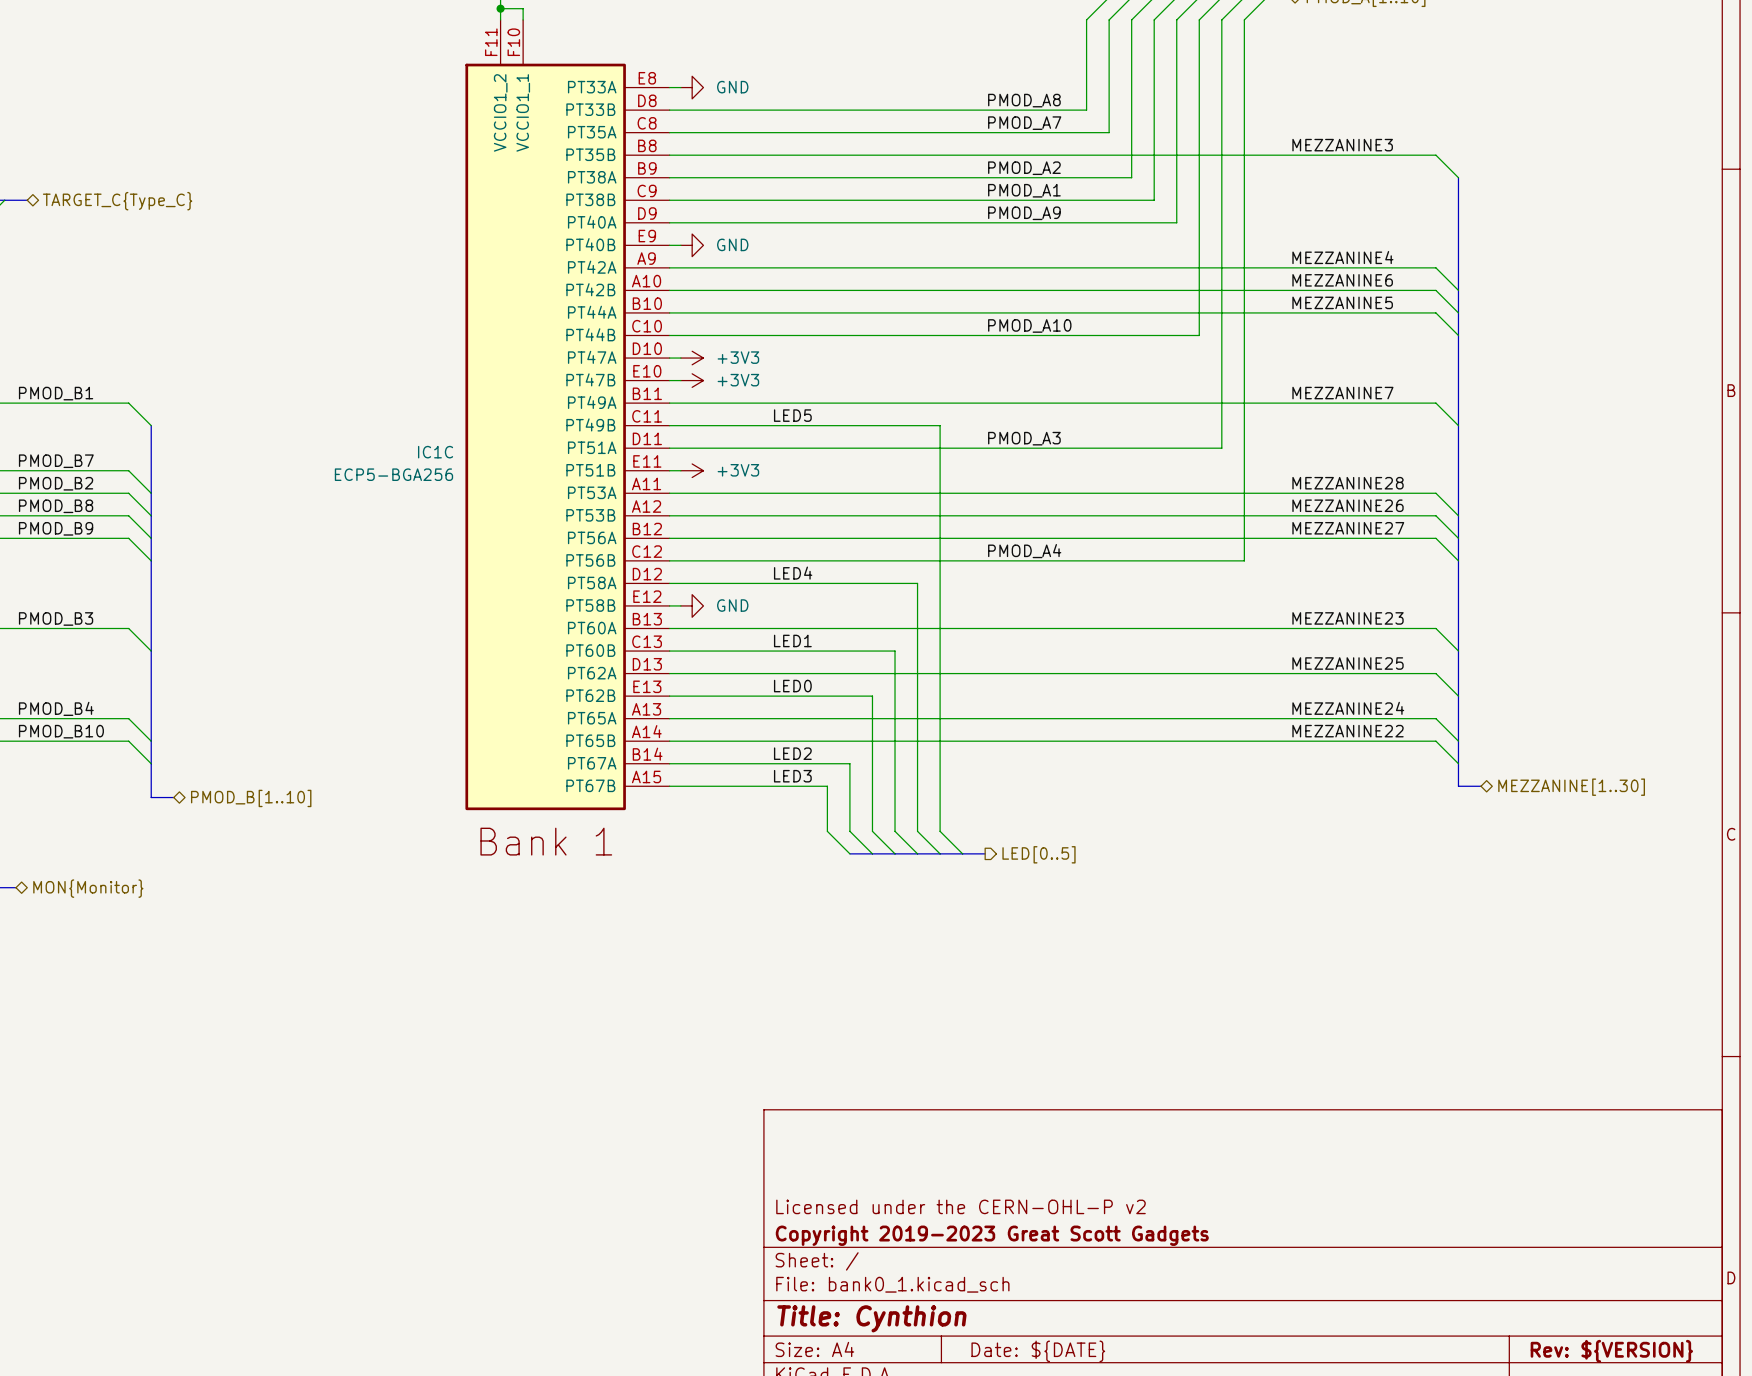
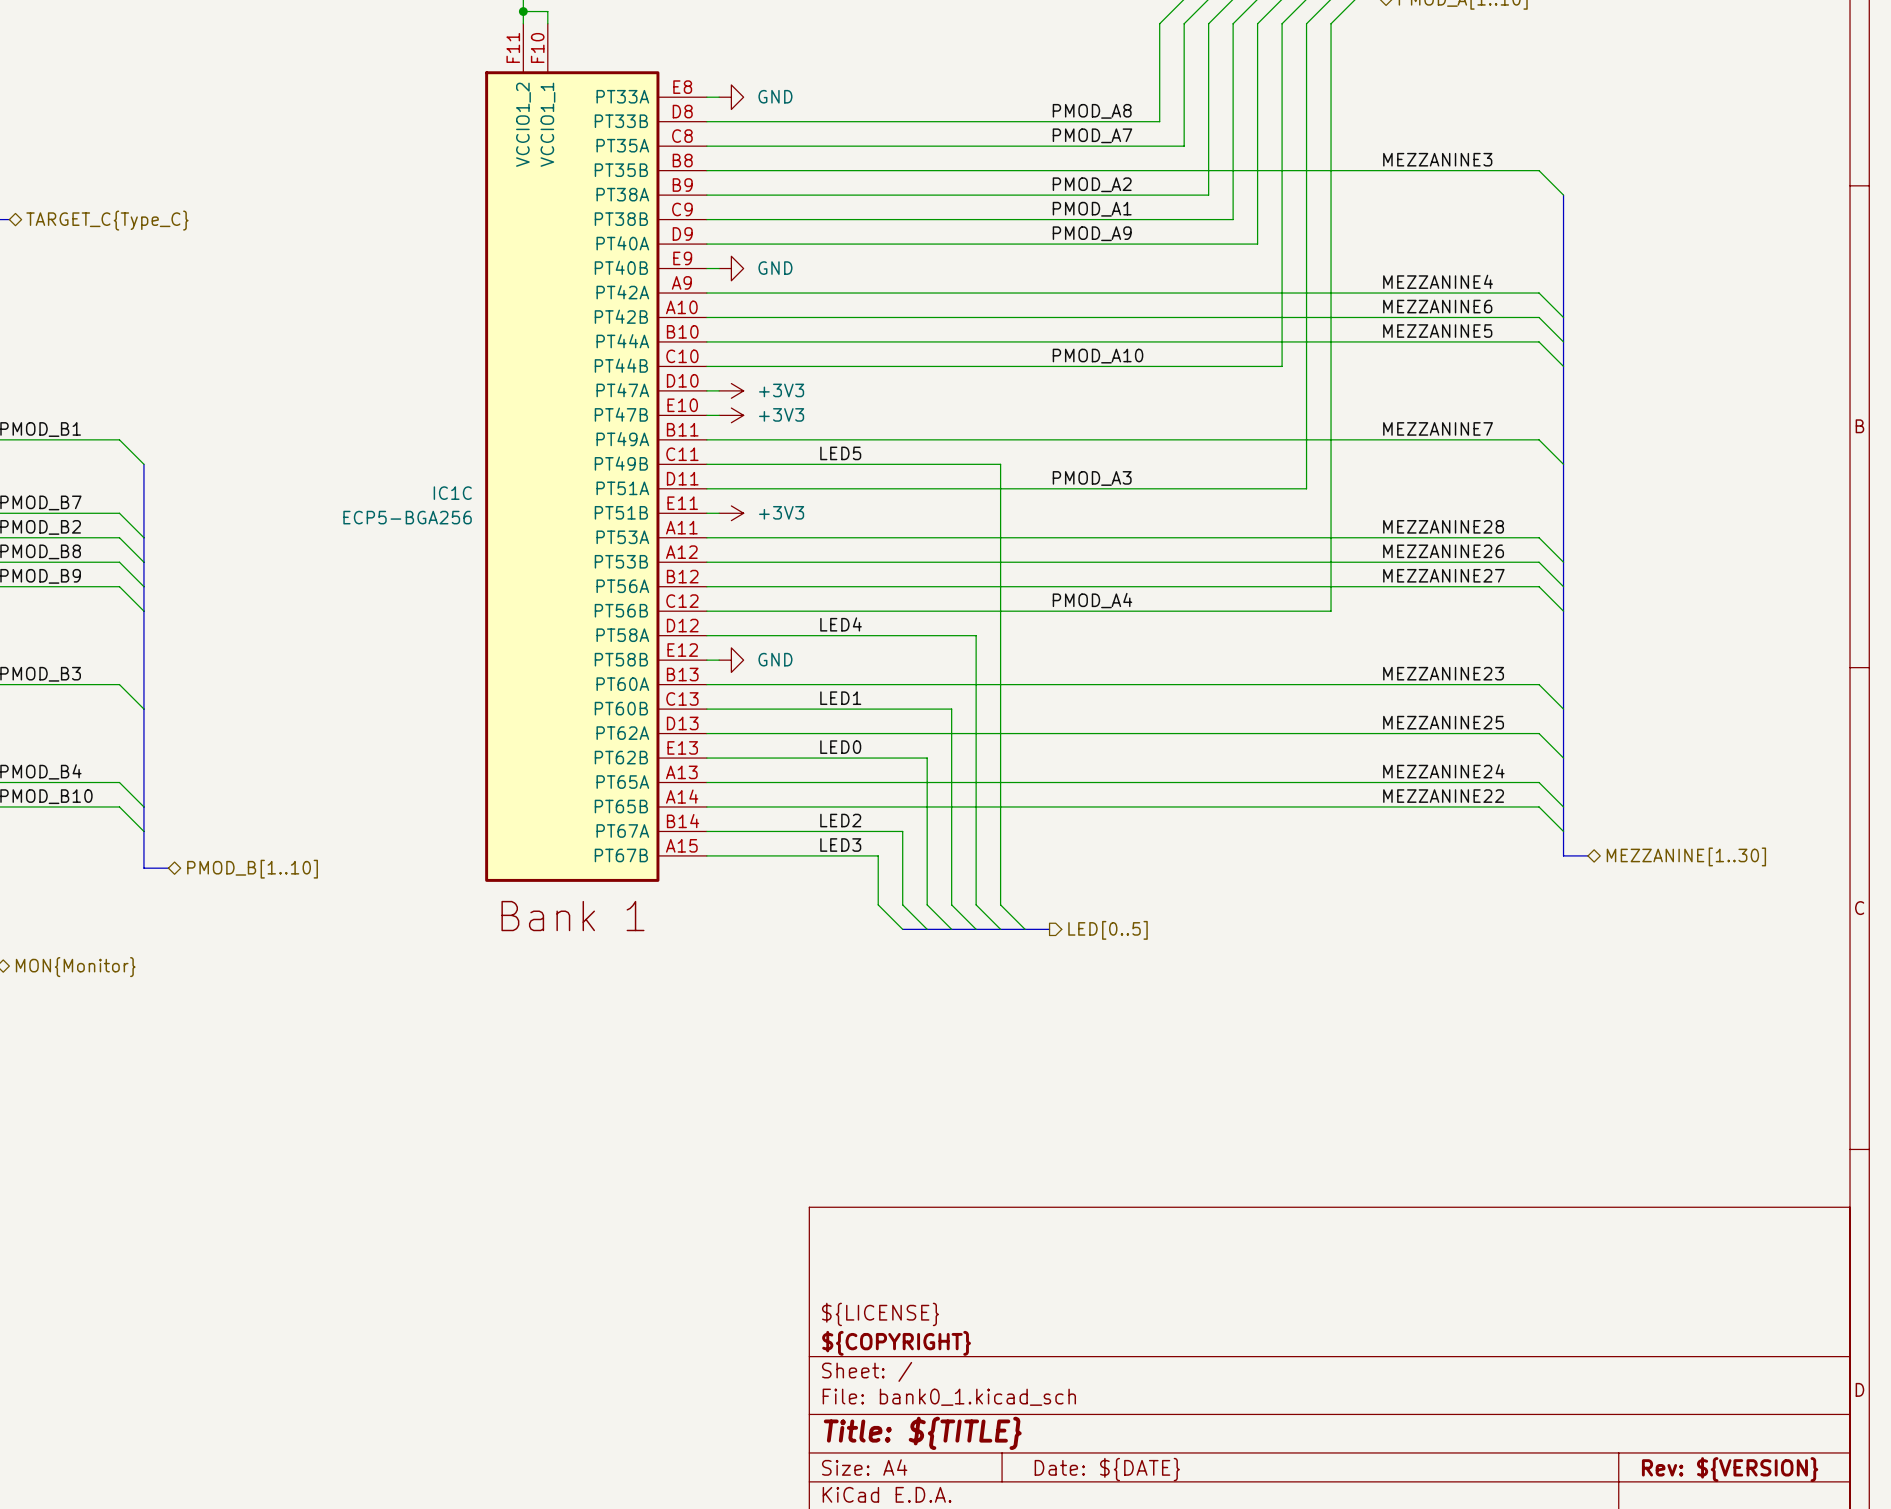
title block: Licensed under the CERN-OHL-P v2 (961, 1206) -> ${LICENSE} (880, 1314)
title block: Copyright 2019-2023 Great Scott Gadgets (992, 1235) -> ${COPYRIGHT} (896, 1343)
title block: Title: Cynthion (871, 1318) -> Title: ${TITLE} (922, 1433)

